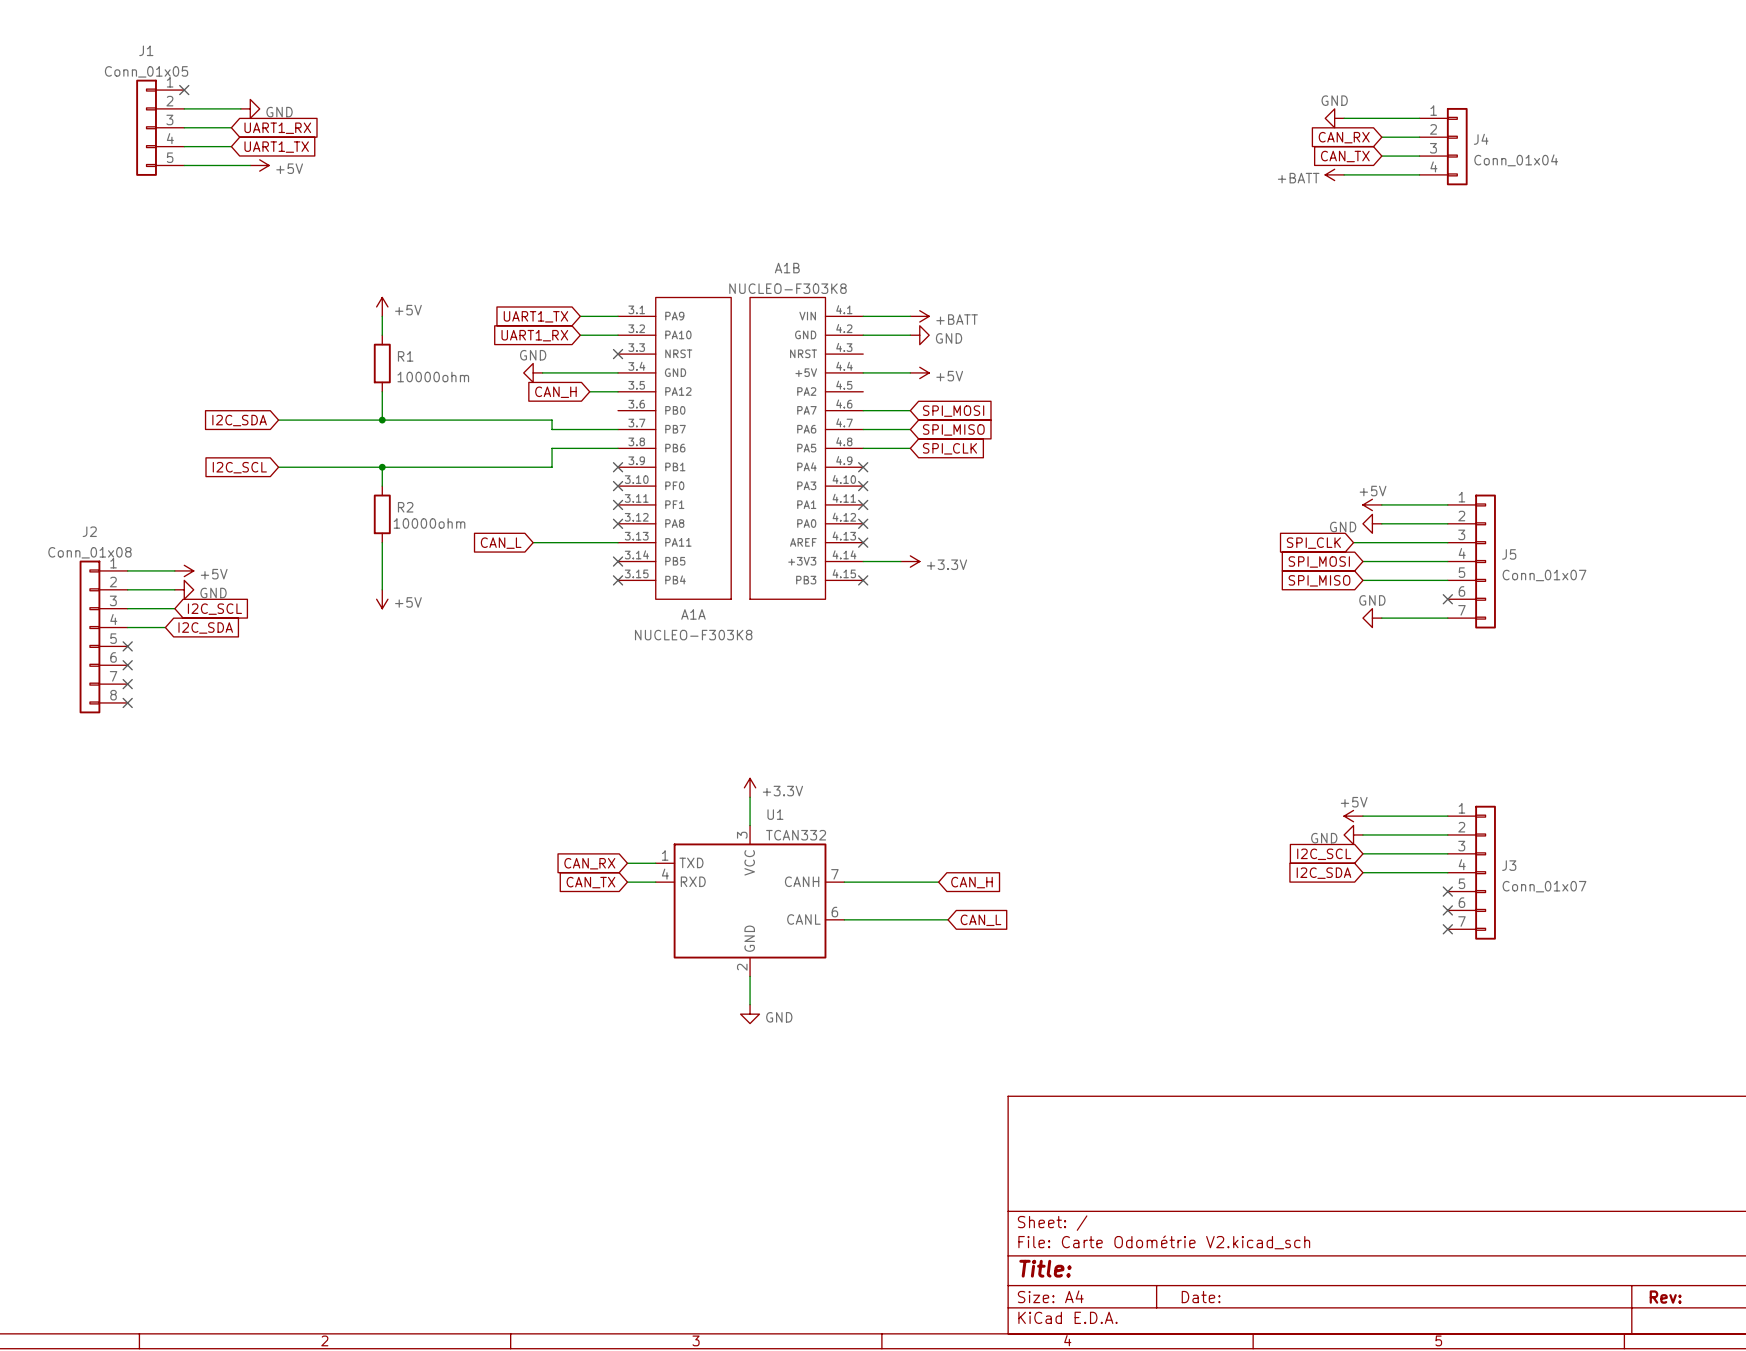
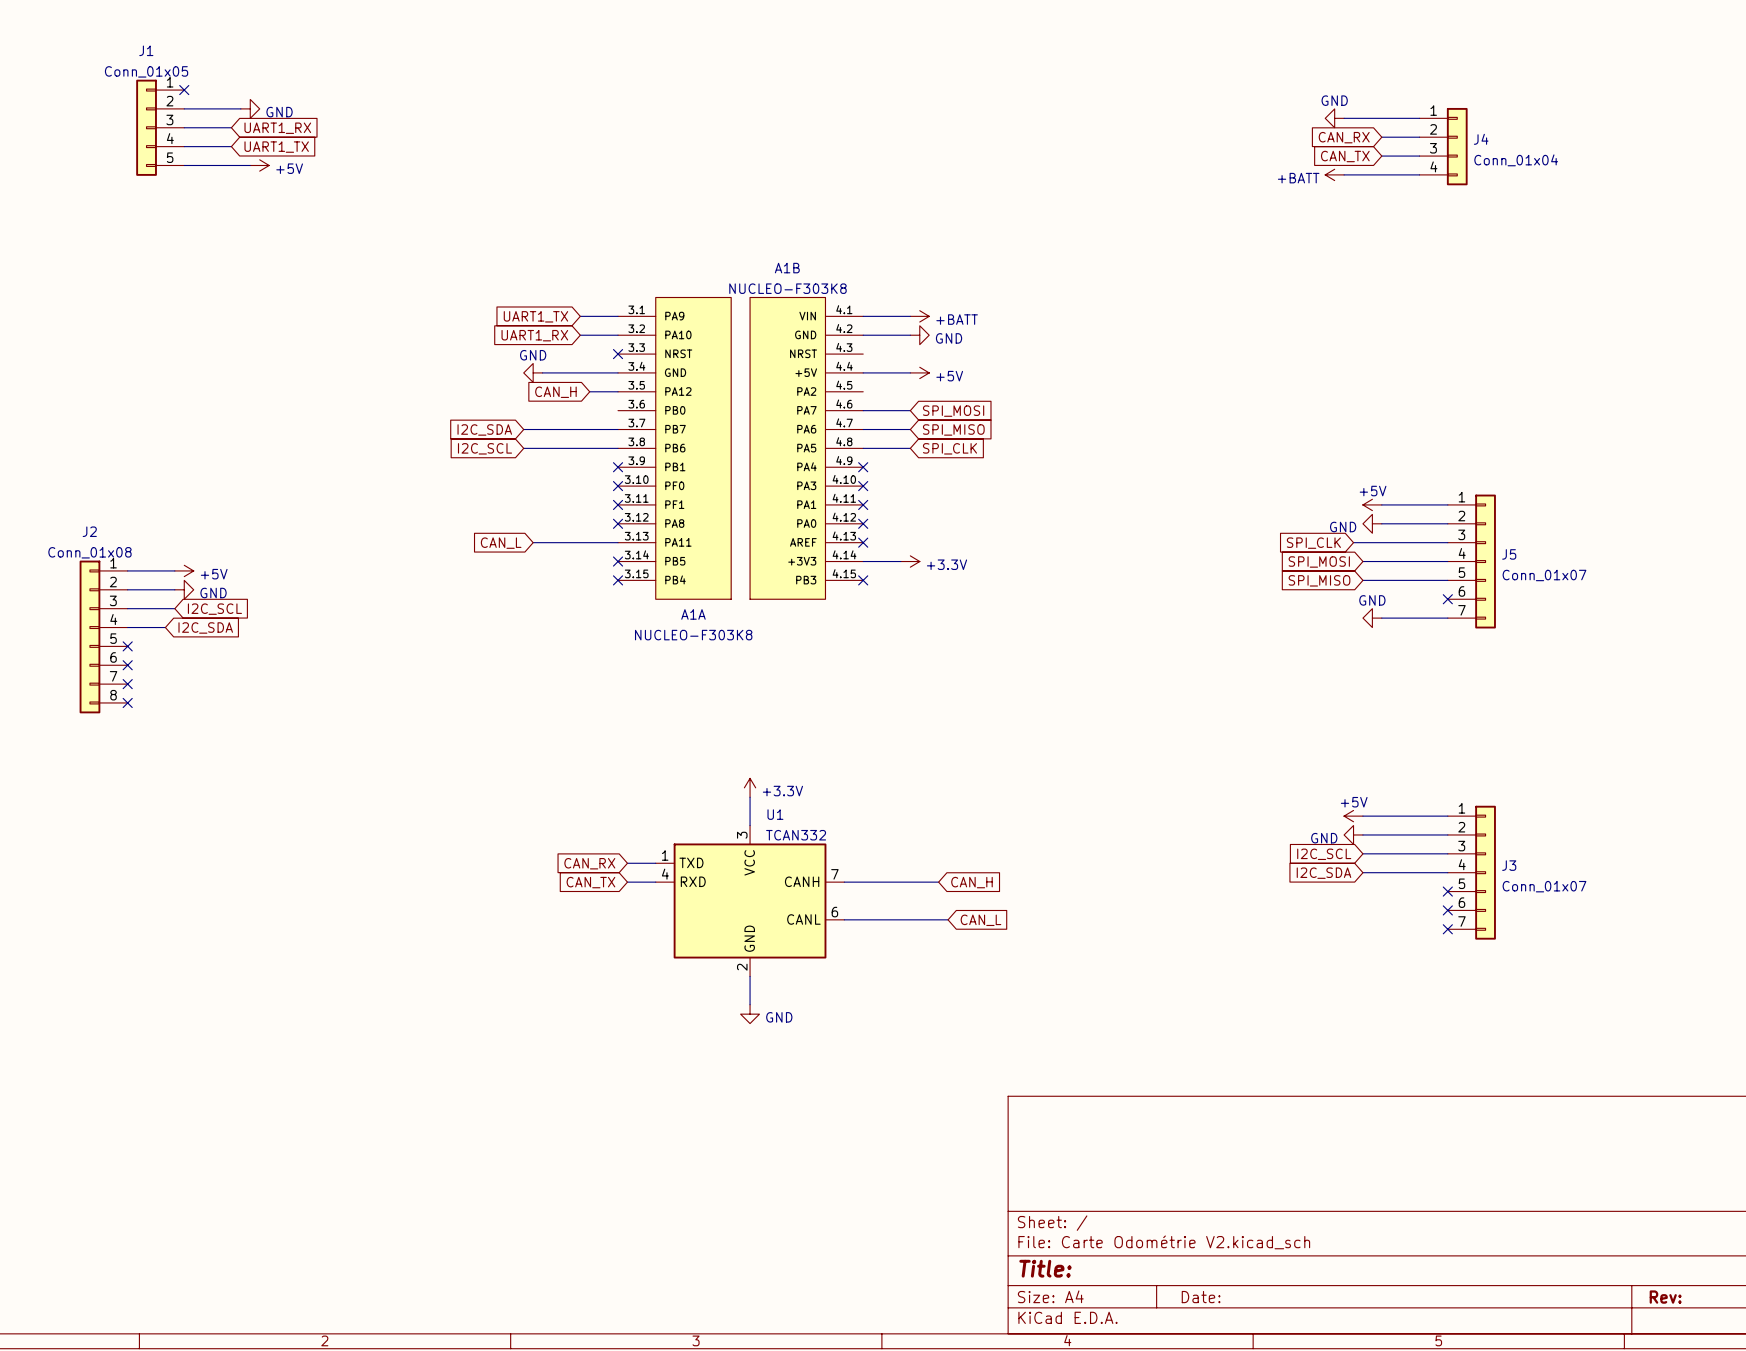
power symbol: +5V (382, 306) -> none
wire: (382, 316) (382, 335) -> none
R1: 10000ohm (382, 363) -> none
wire: (382, 391) (382, 420) -> none
global label: I2C_SDA (239, 420) -> none
wire: (278, 420) (552, 420) (552, 429) -> (523, 429) (552, 429)
junction: (382, 420) -> none
global label: none -> I2C_SDA (484, 429)
global label: none -> I2C_SCL (484, 448)
wire: (552, 448) (552, 467) (278, 467) -> (552, 448) (523, 448)
global label: I2C_SCL (239, 467) -> none
wire: (382, 467) (382, 486) -> none
junction: (382, 467) -> none
R2: 10000ohm (382, 514) -> none
wire: (382, 542) (382, 589) -> none
power symbol: +5V (382, 599) -> none

